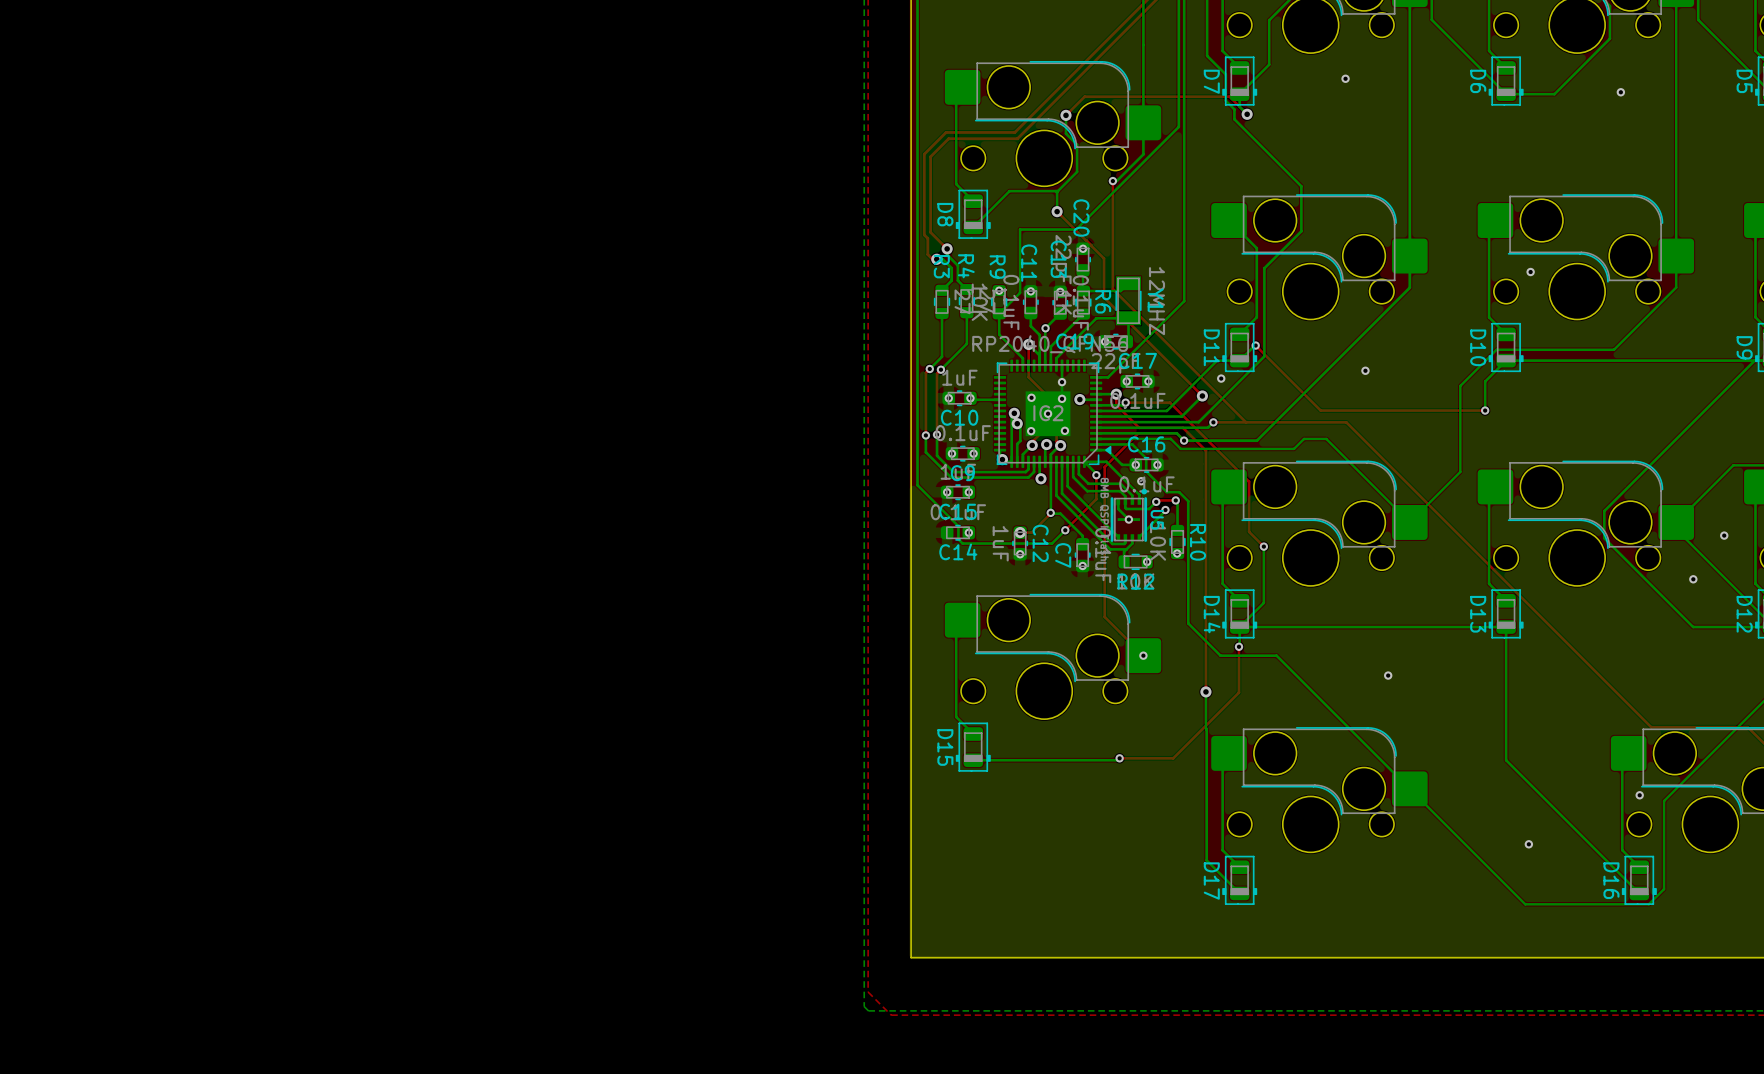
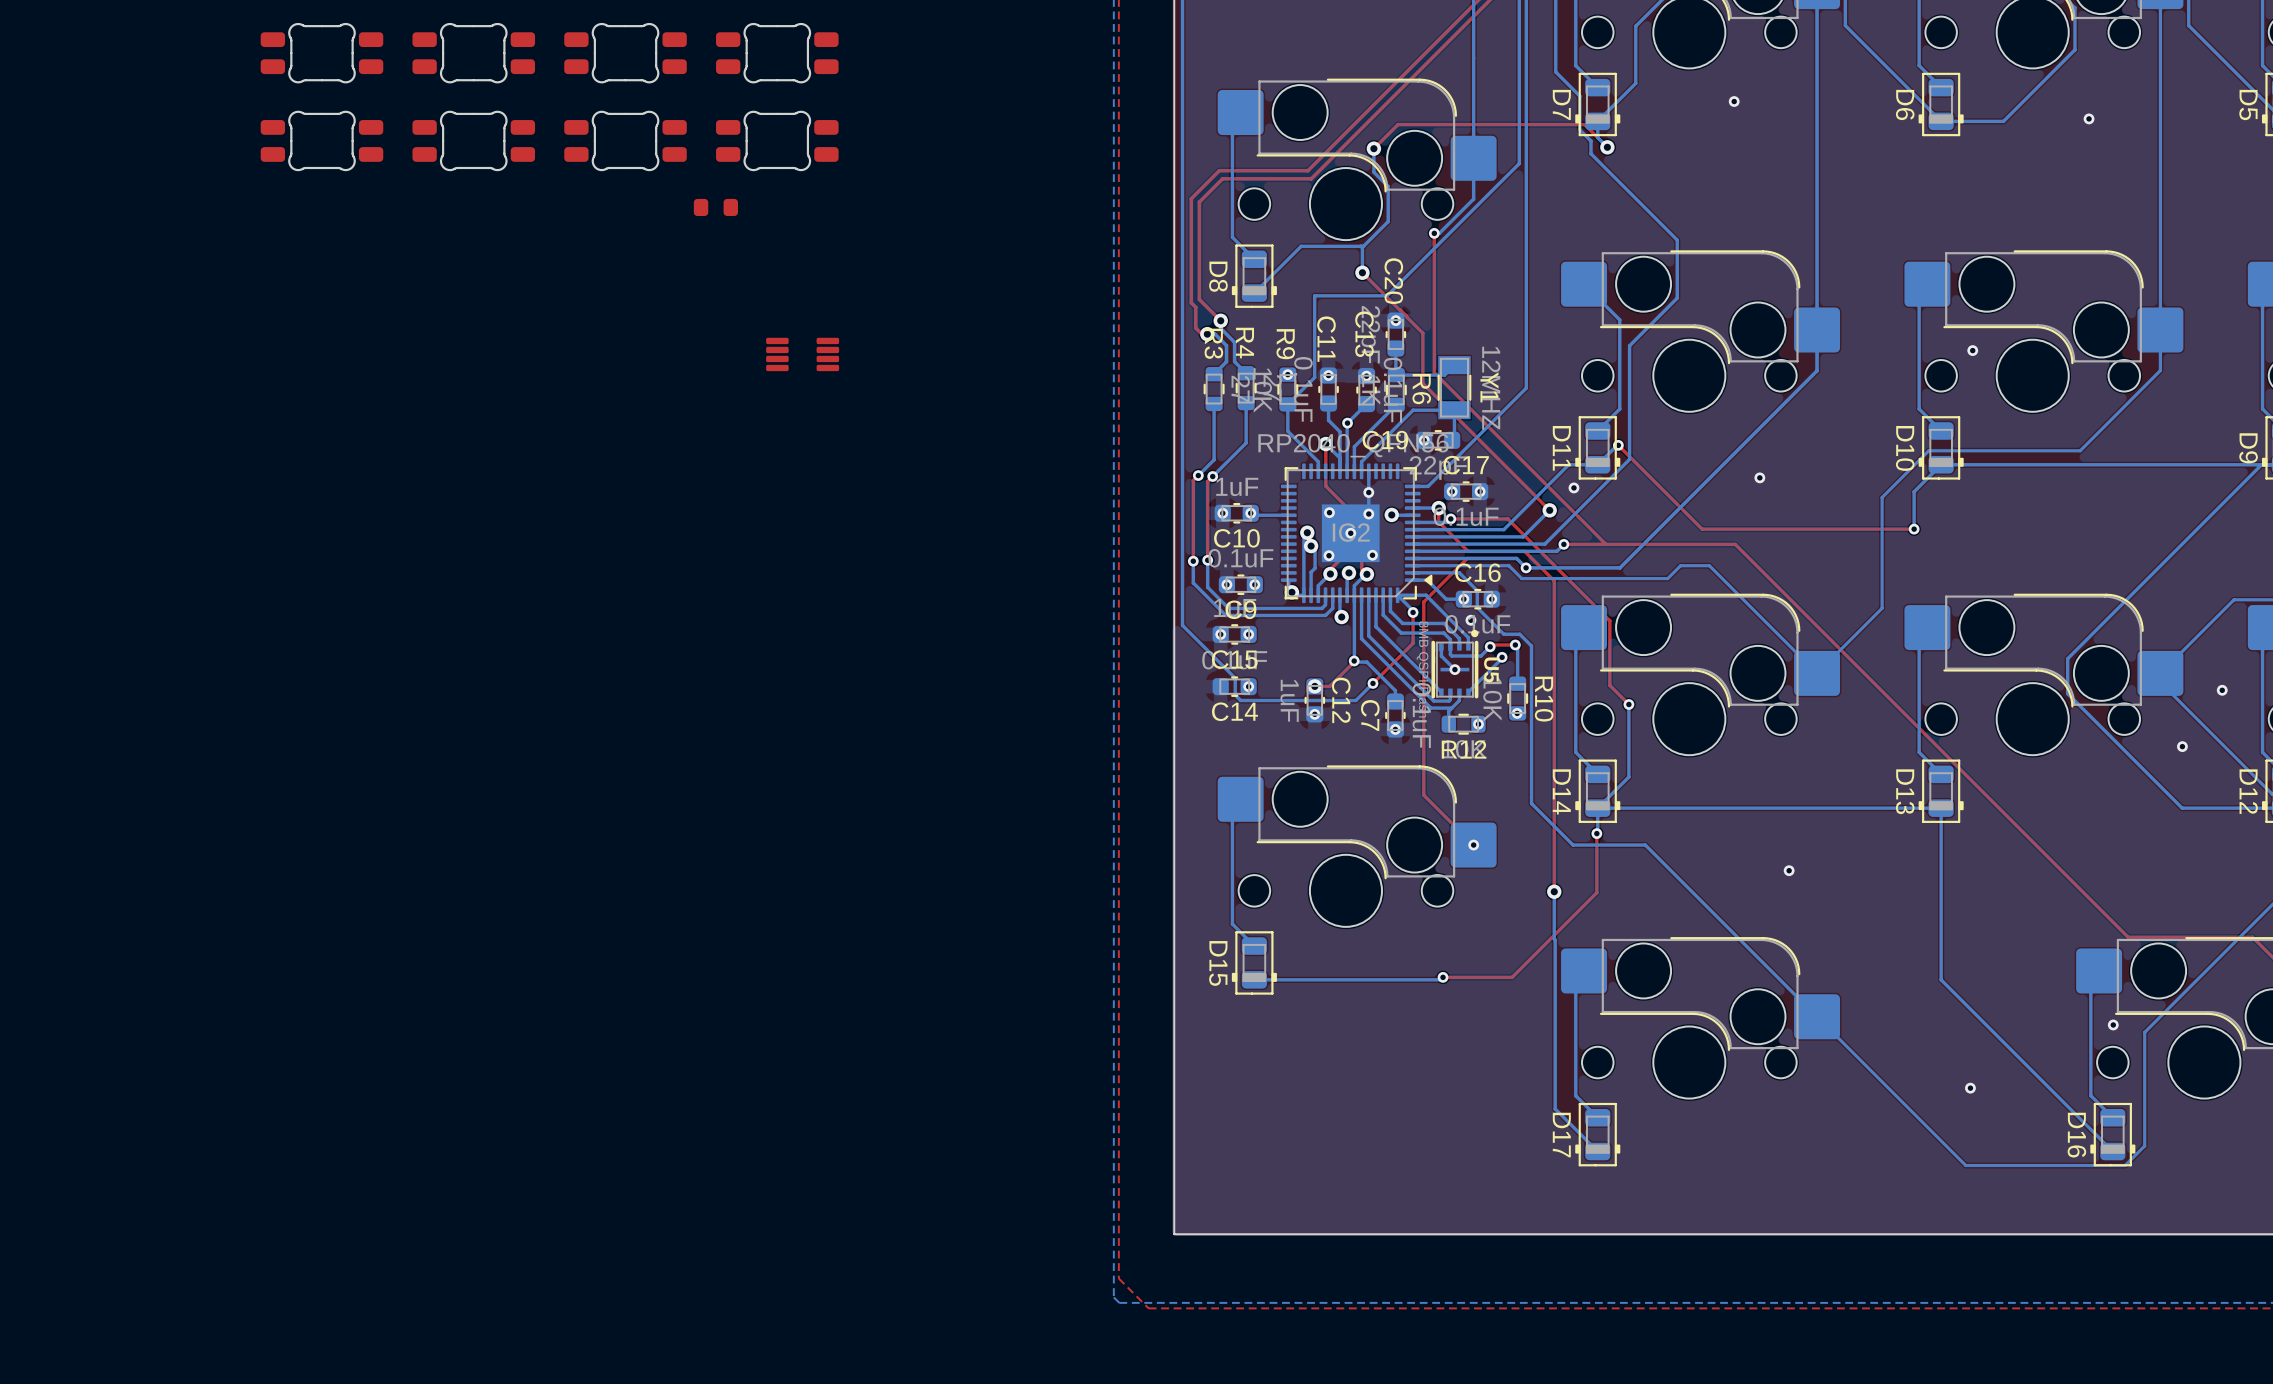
part: none -> (321, 53)
part: none -> (473, 53)
part: none -> (625, 53)
part: none -> (777, 53)
part: none -> (321, 140)
part: none -> (473, 140)
part: none -> (625, 140)
part: none -> (777, 140)
part: none -> (715, 207)
part: none -> (802, 354)

